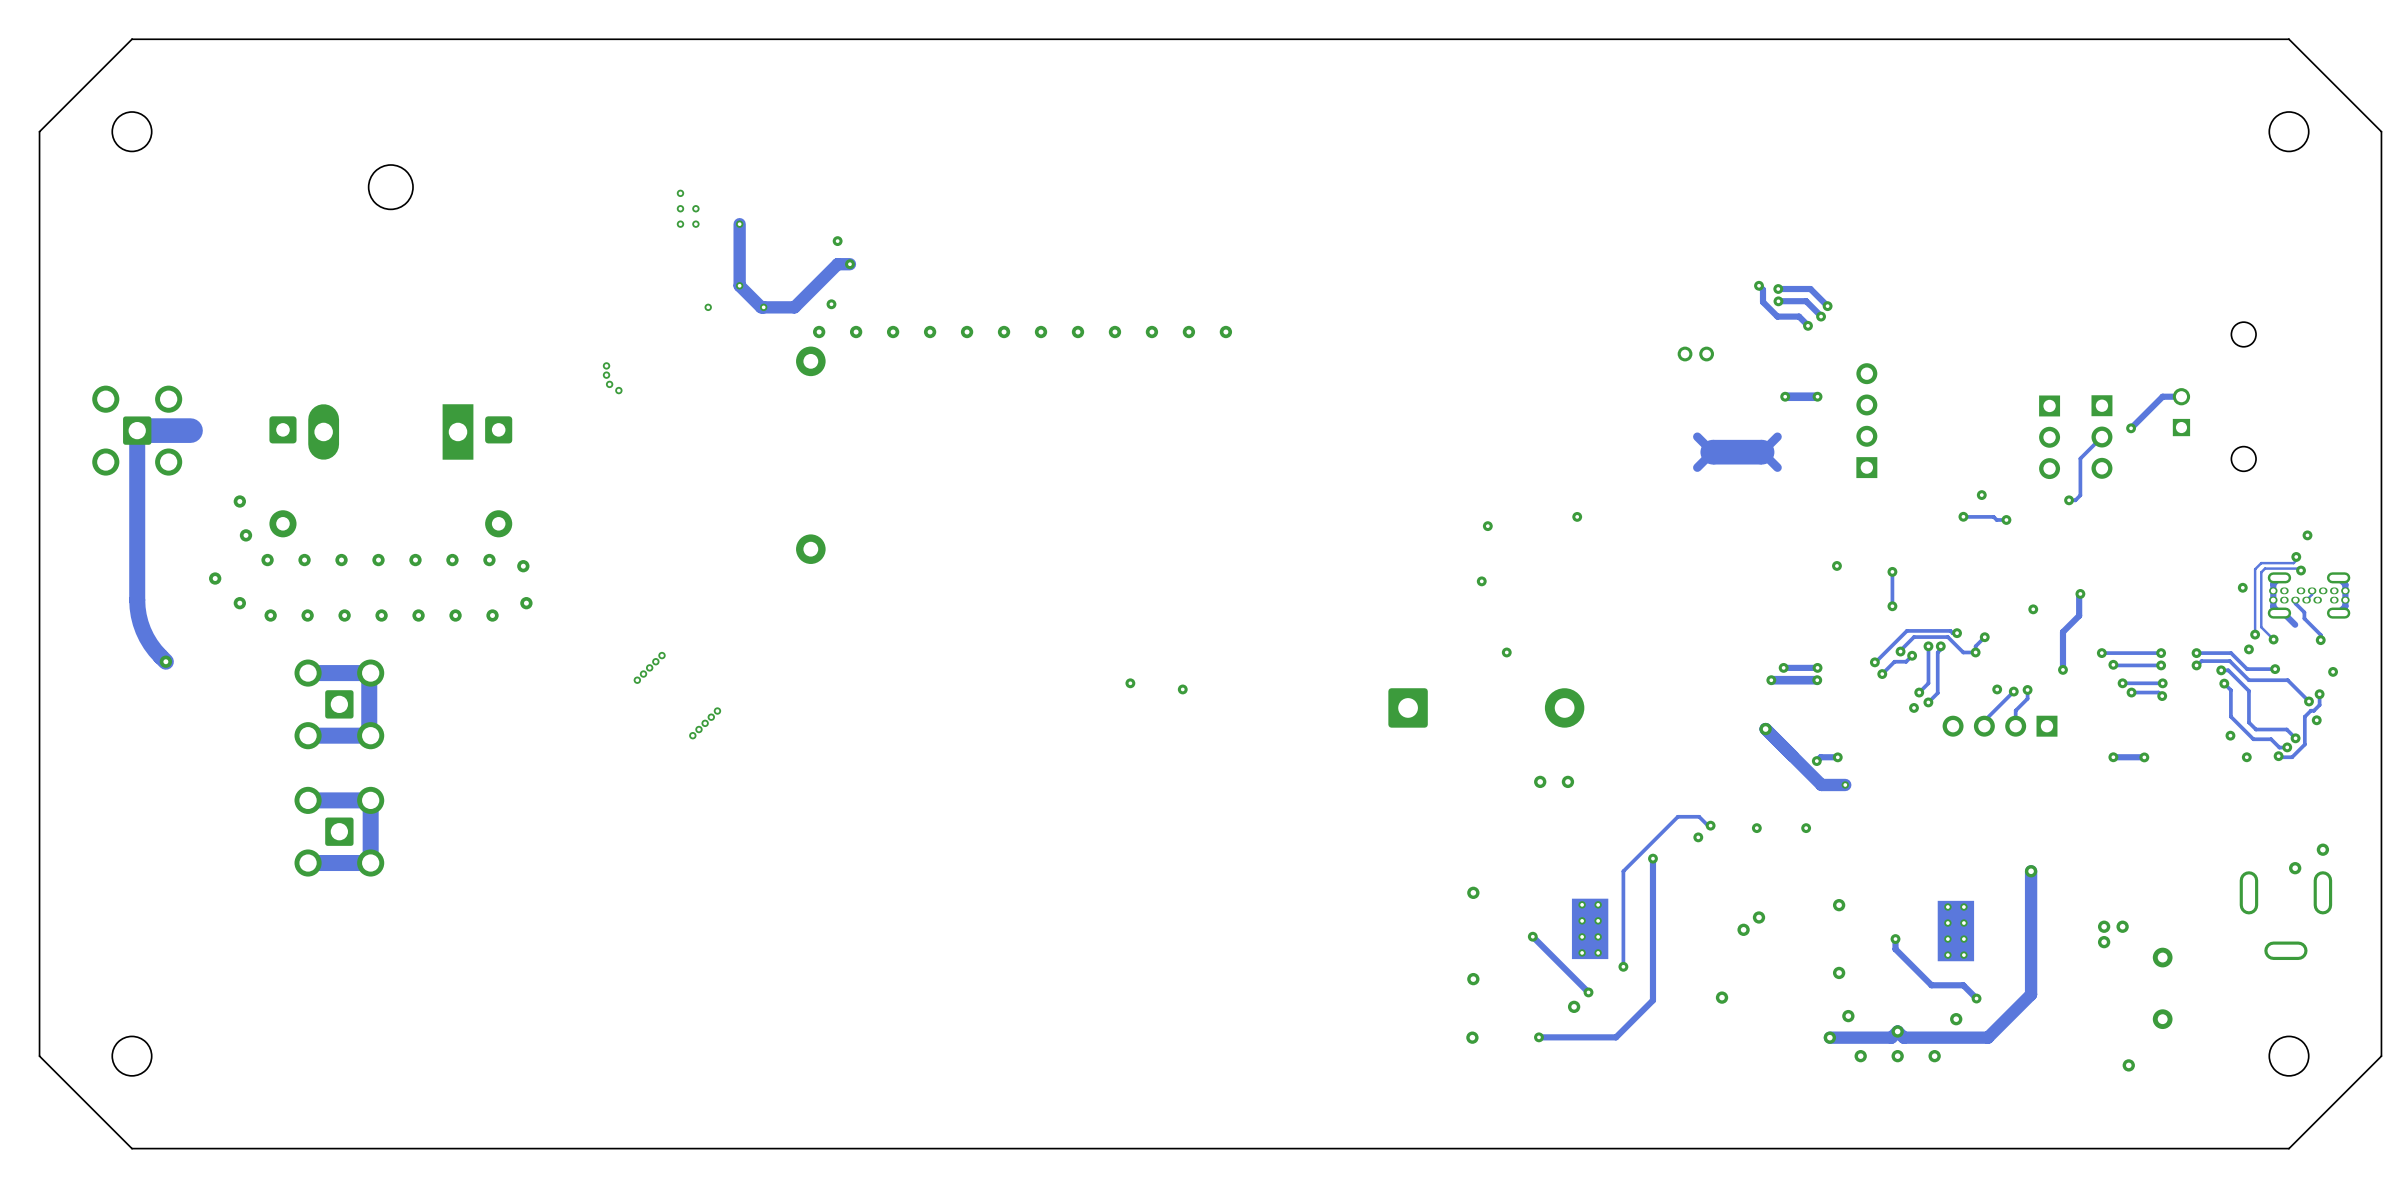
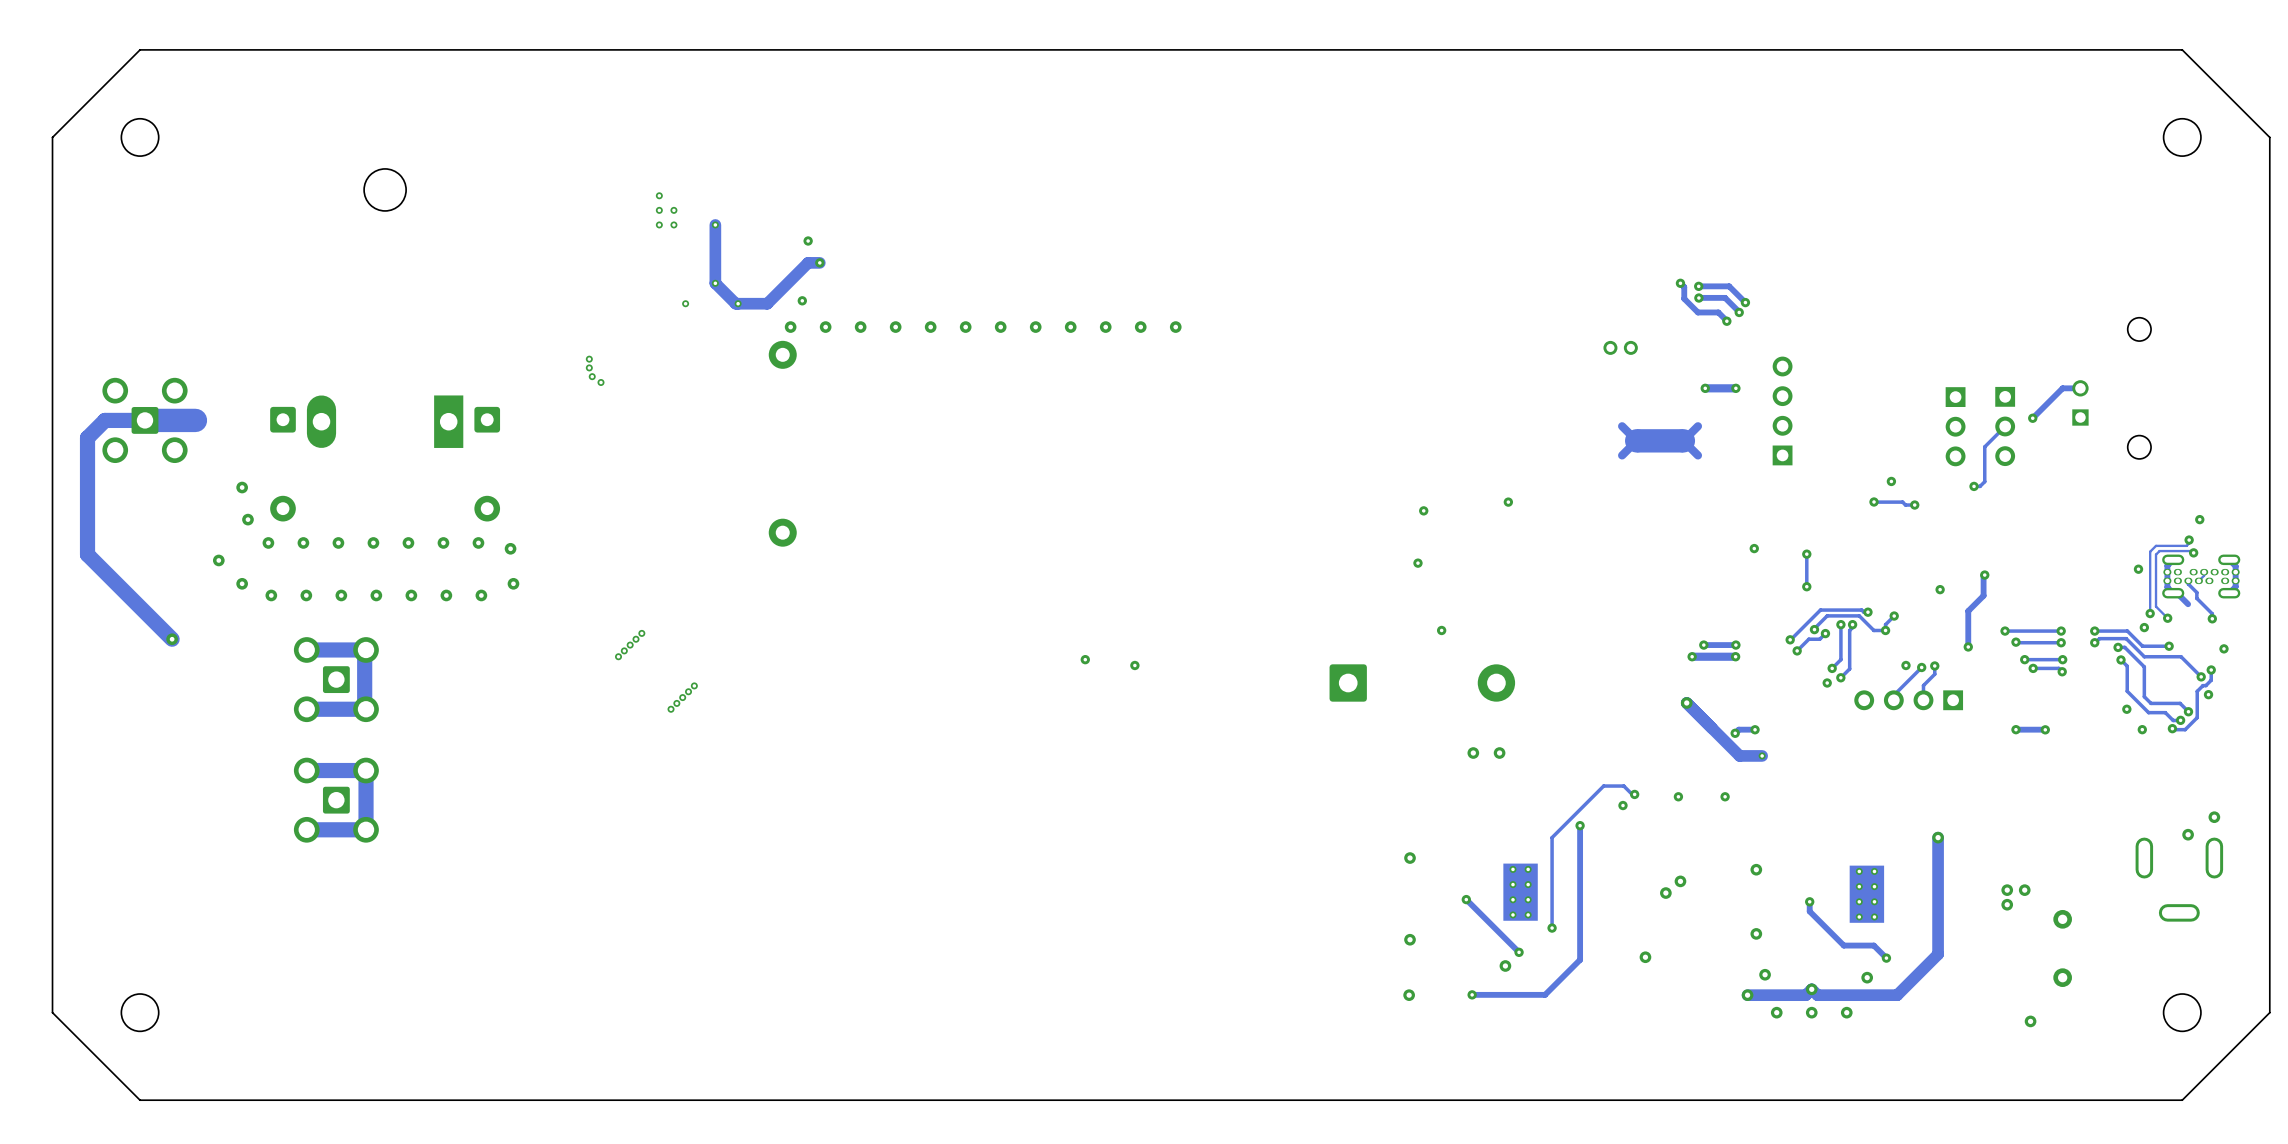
track: (137, 430) (137, 607) (140, 623) (146, 637) (160, 656) -> (144, 420) (105, 420) (87, 437) (87, 554) (167, 634)

